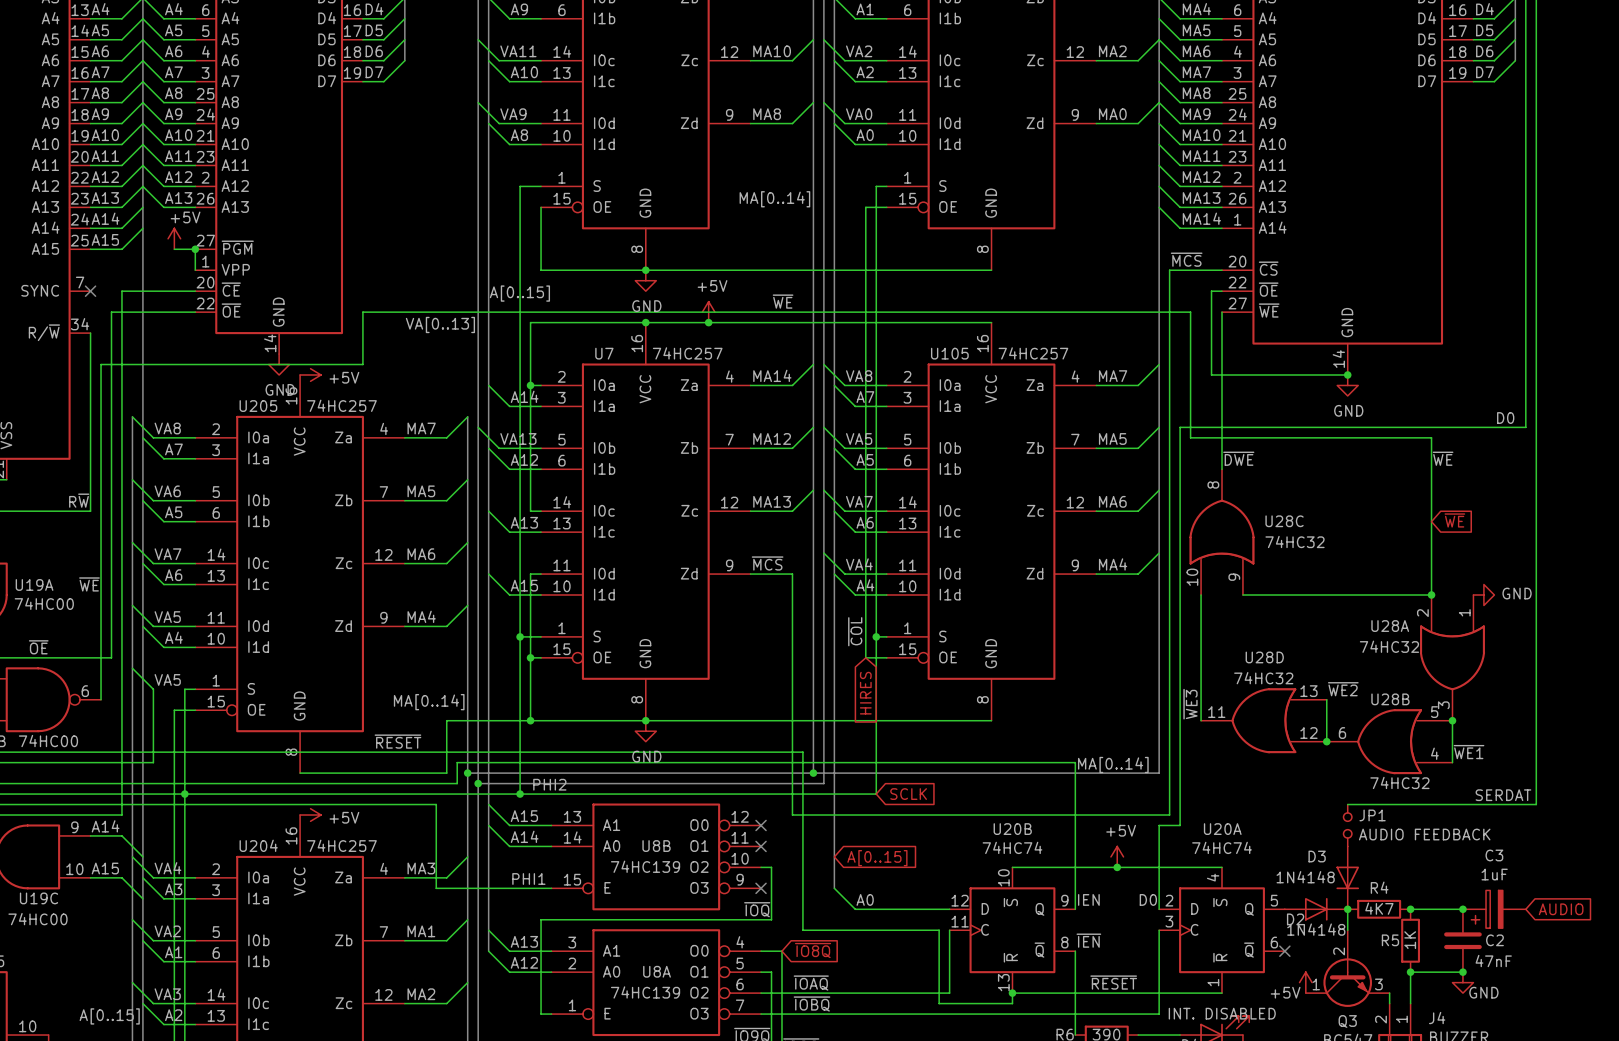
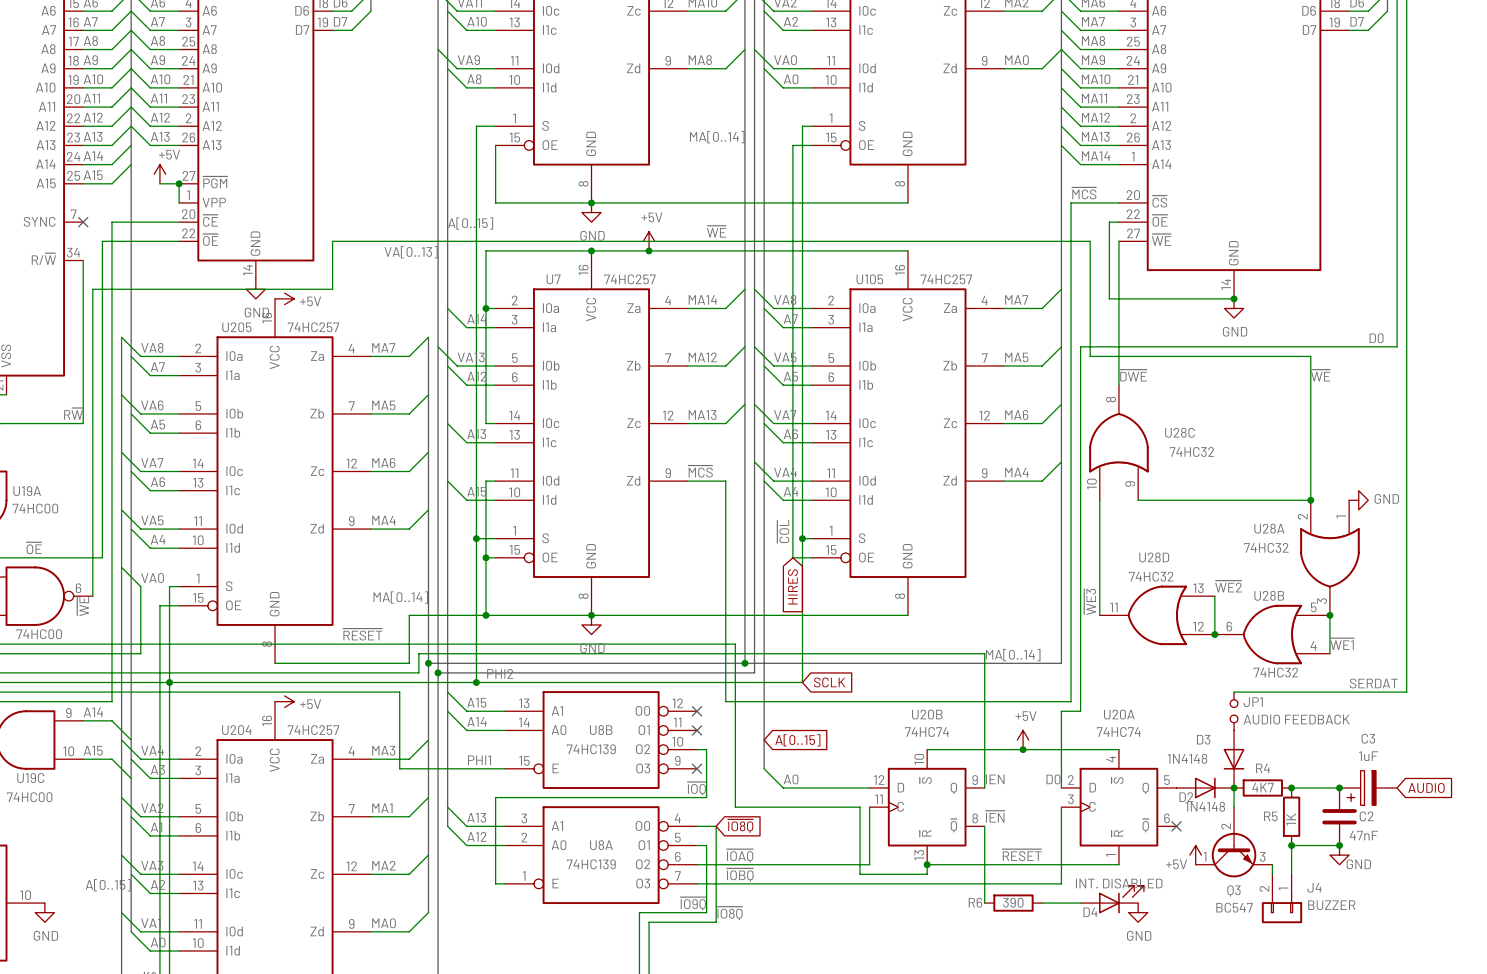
global label: ~{WE} (1454, 520) -> none
label rotation: 0° (89, 584) -> 90° counterclockwise (83, 606)
label position: ~{WE} (89, 584) -> ~{WE} (83, 606)
label: VA5 (167, 679) -> VA0 (152, 578)

